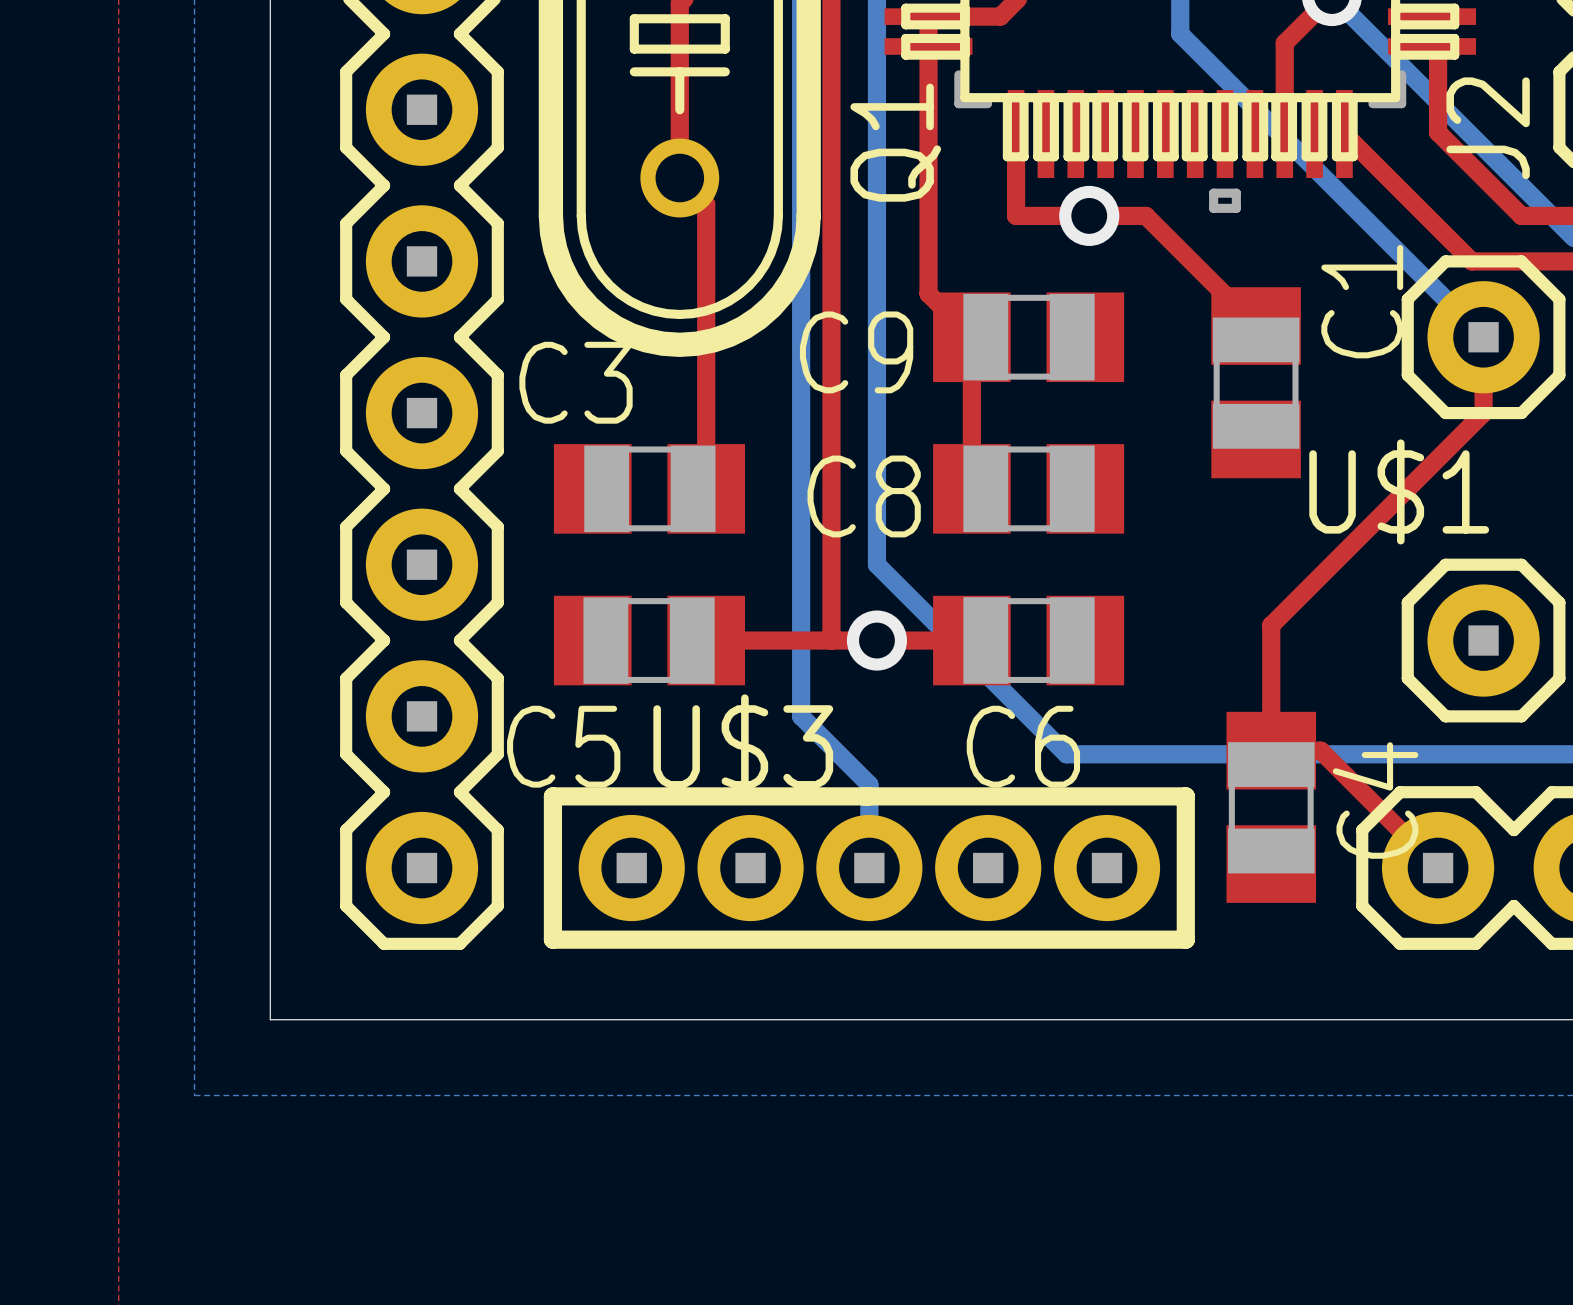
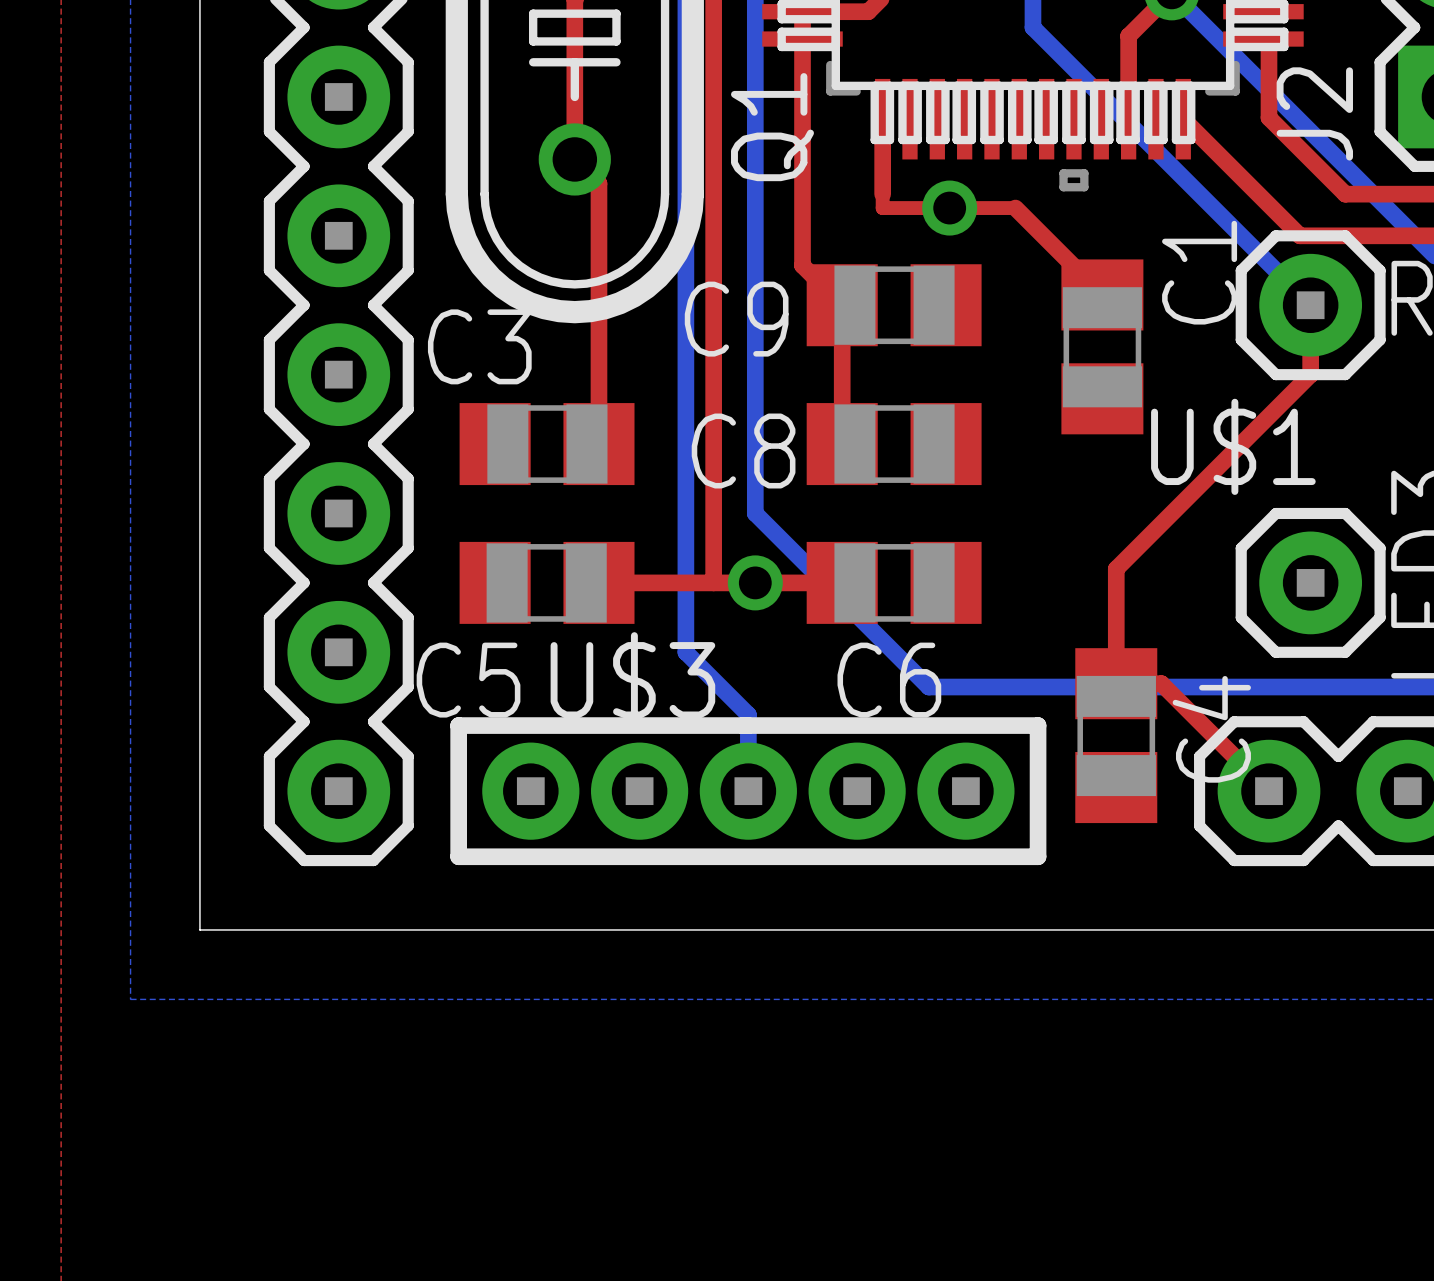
top track: (1016, 215) (1145, 215) (1161, 231) -> (882, 194) (882, 208) (1015, 208)
via position: (1089, 215) -> (949, 208)

